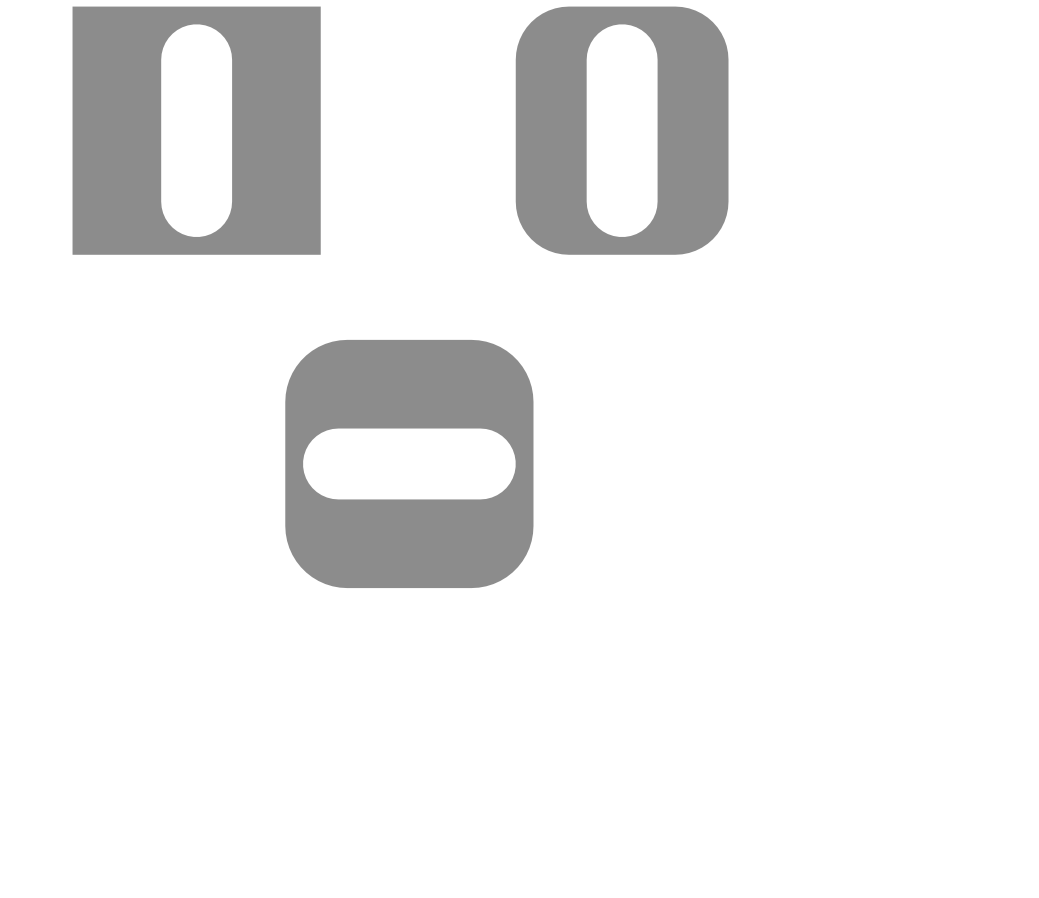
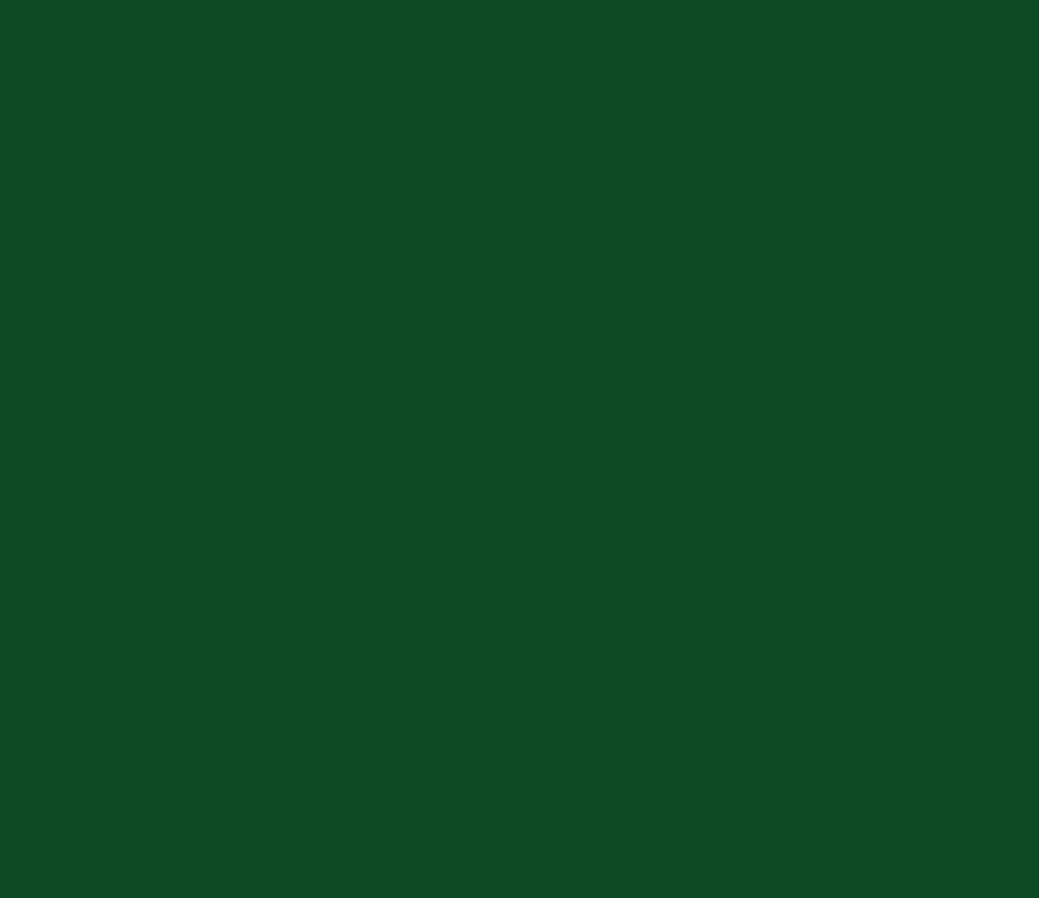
part: (400, 297) -> none

